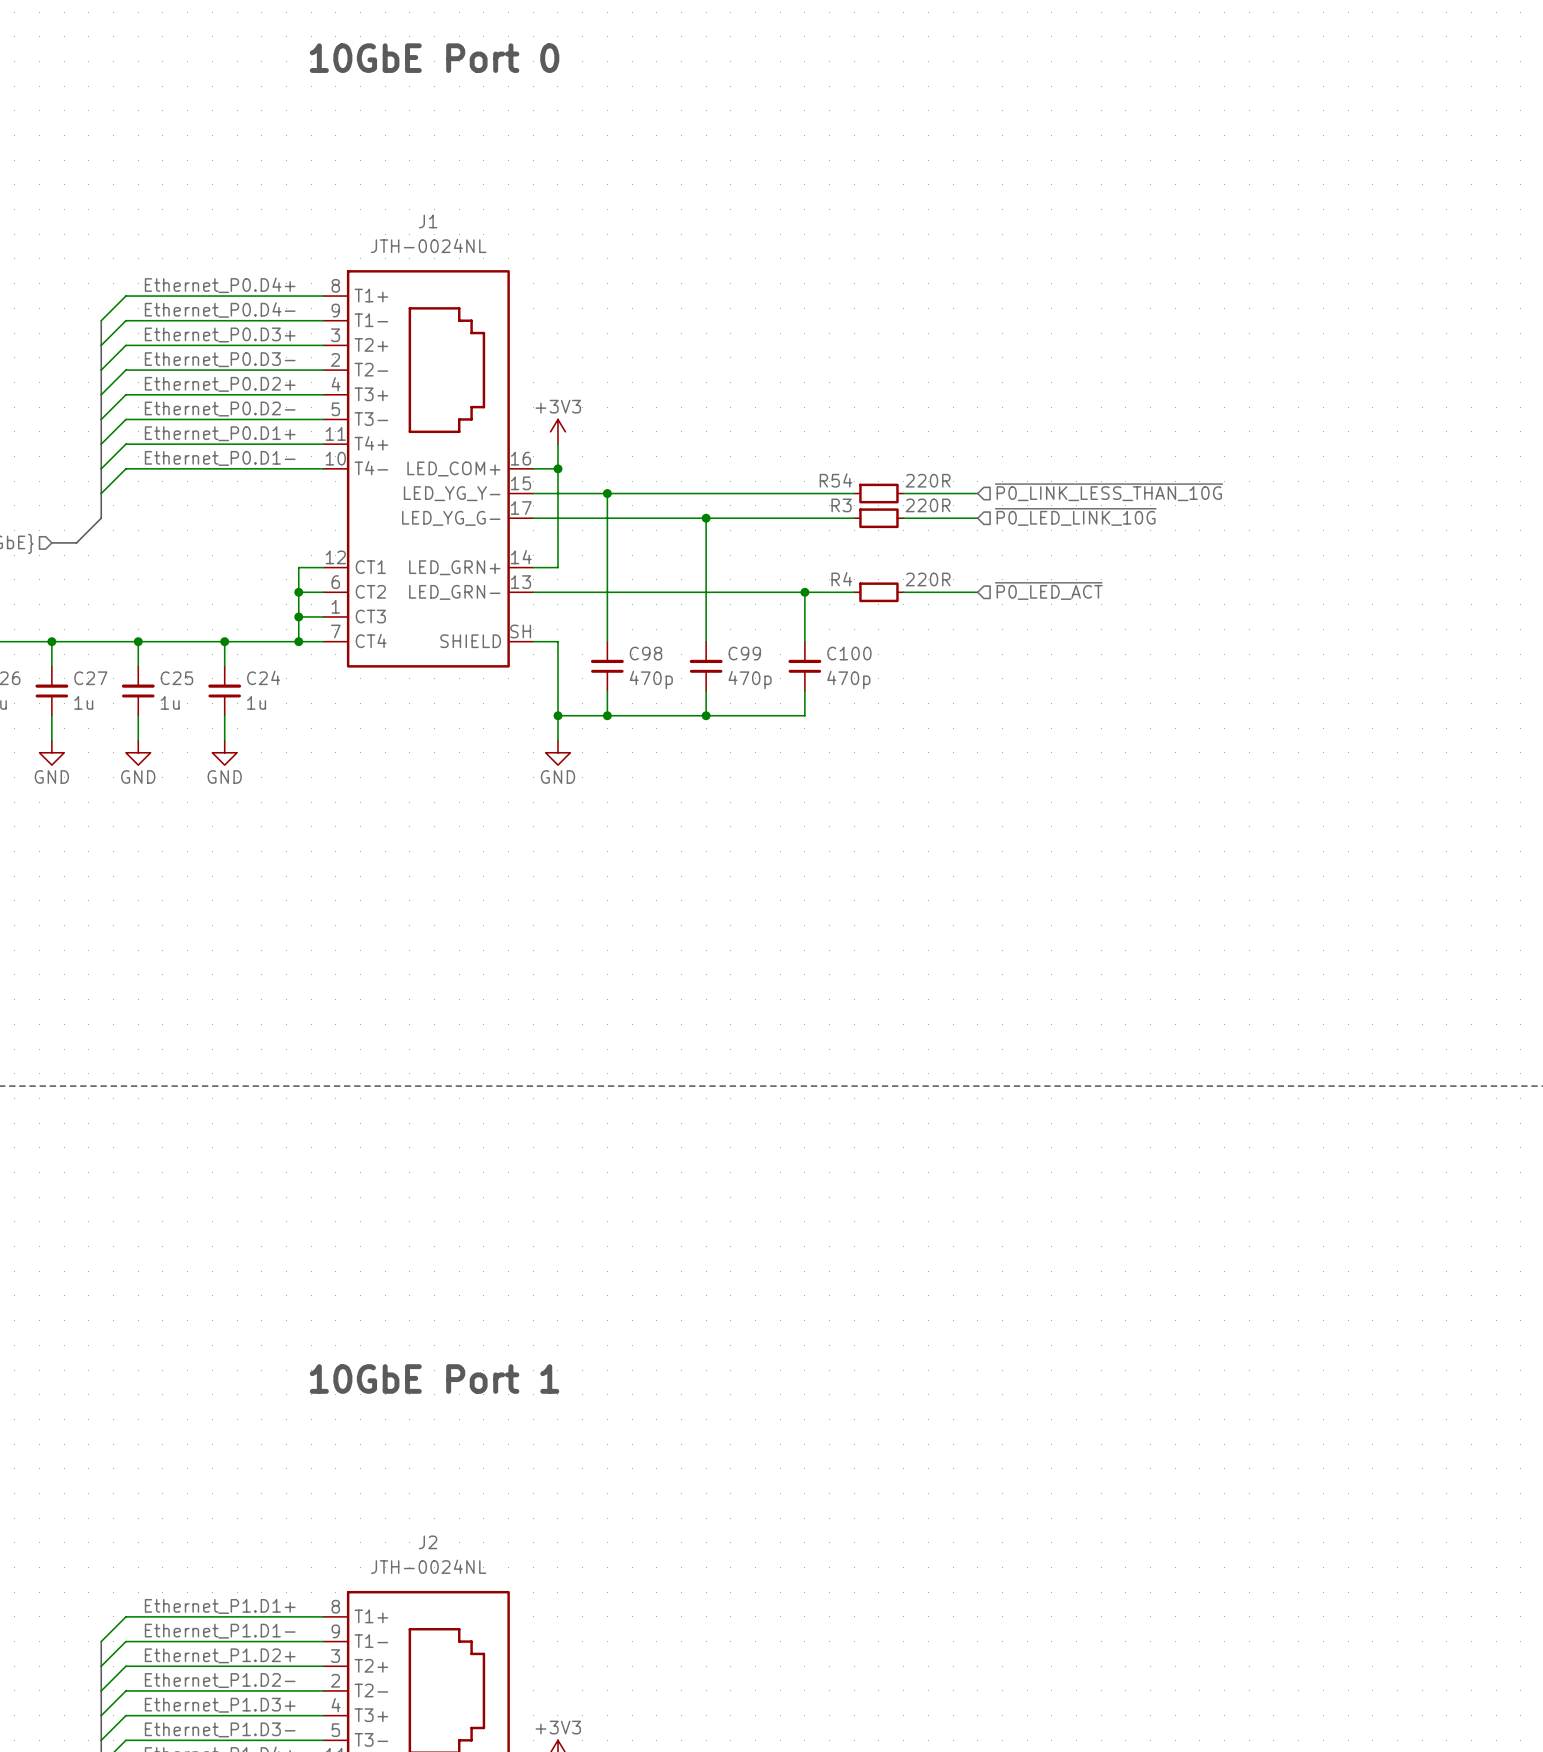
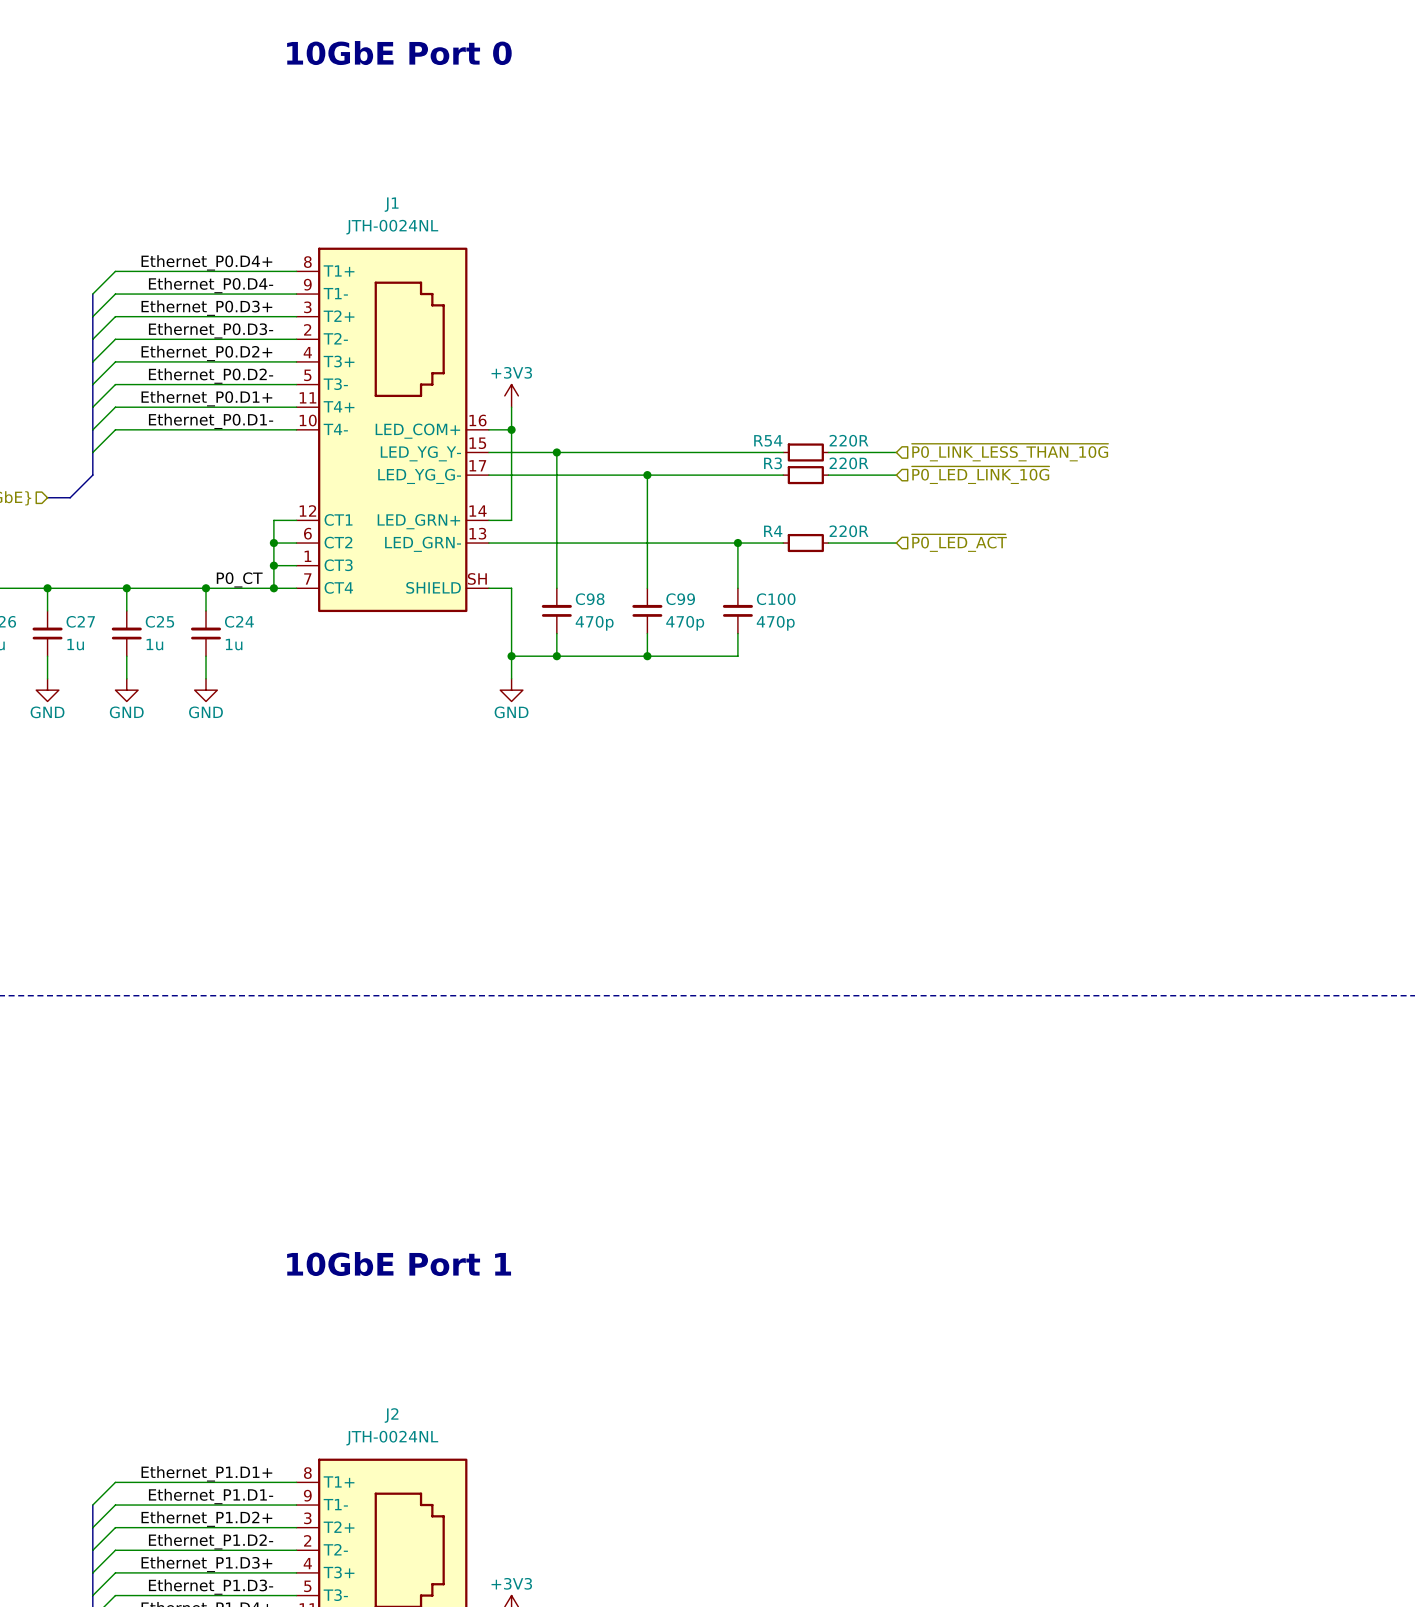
label: none -> P0_CT (239, 579)

